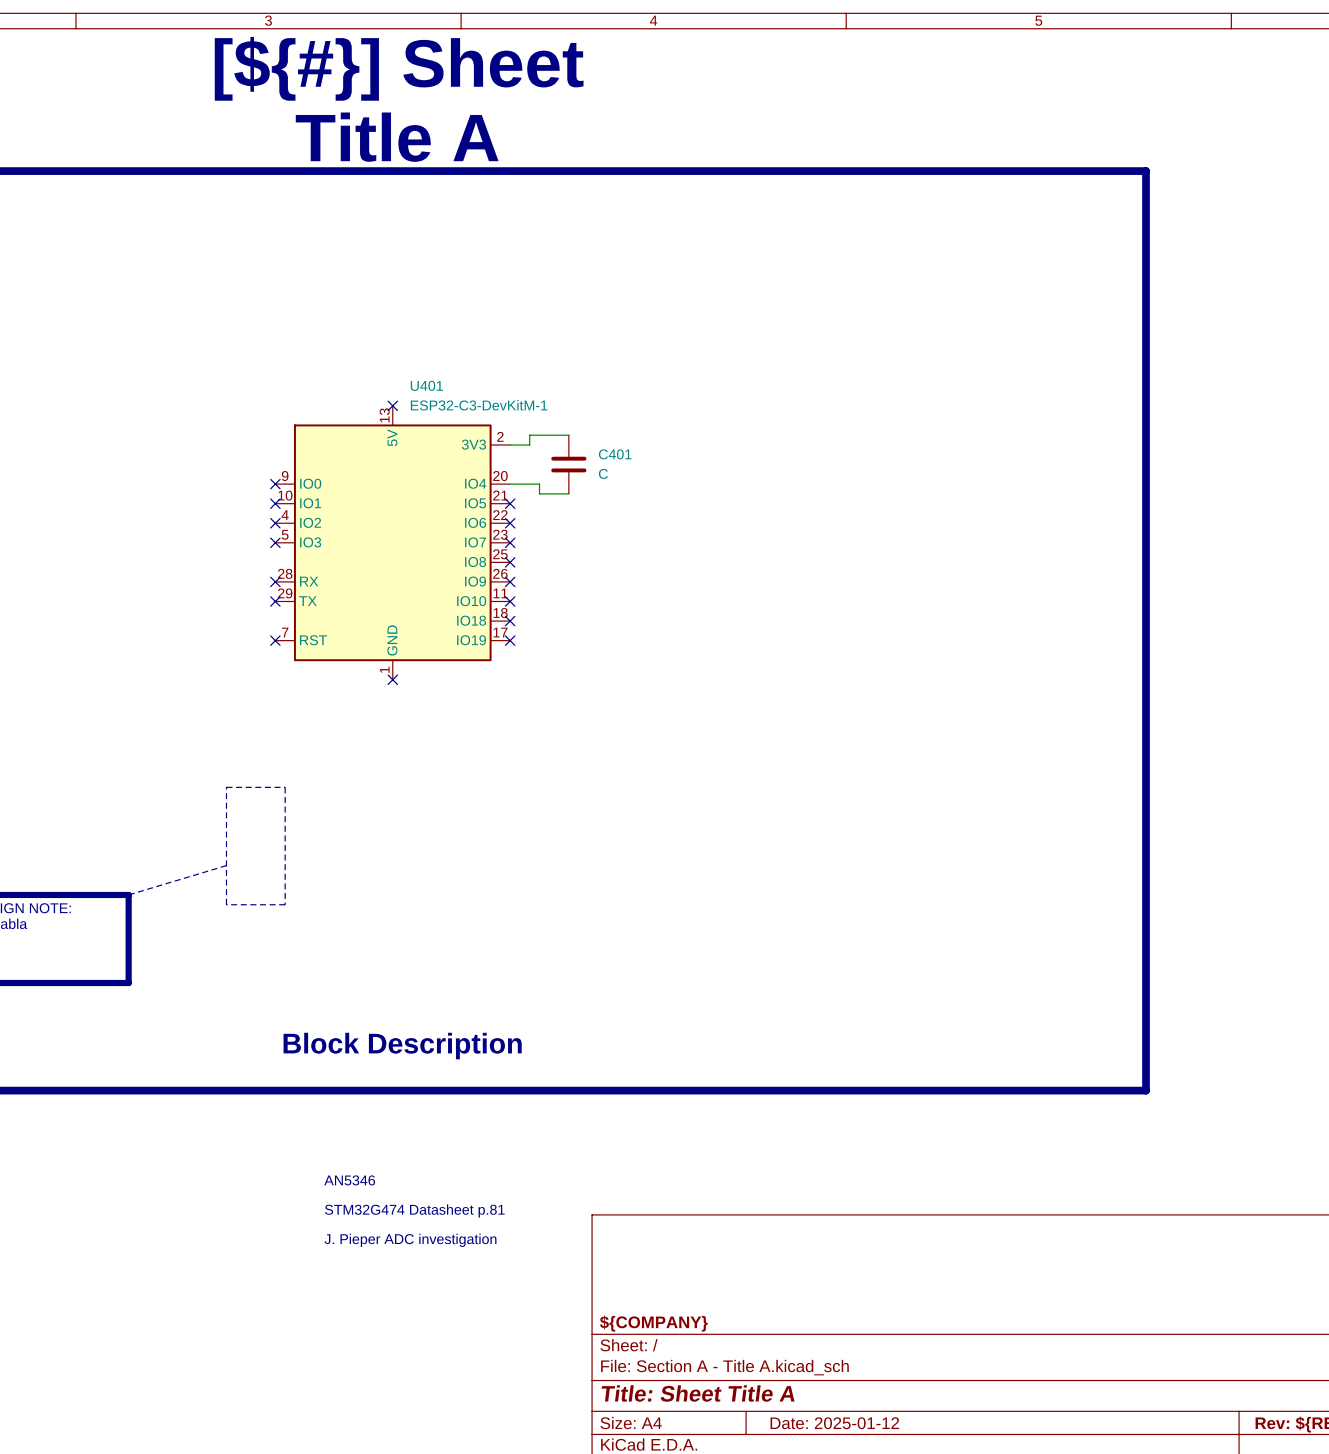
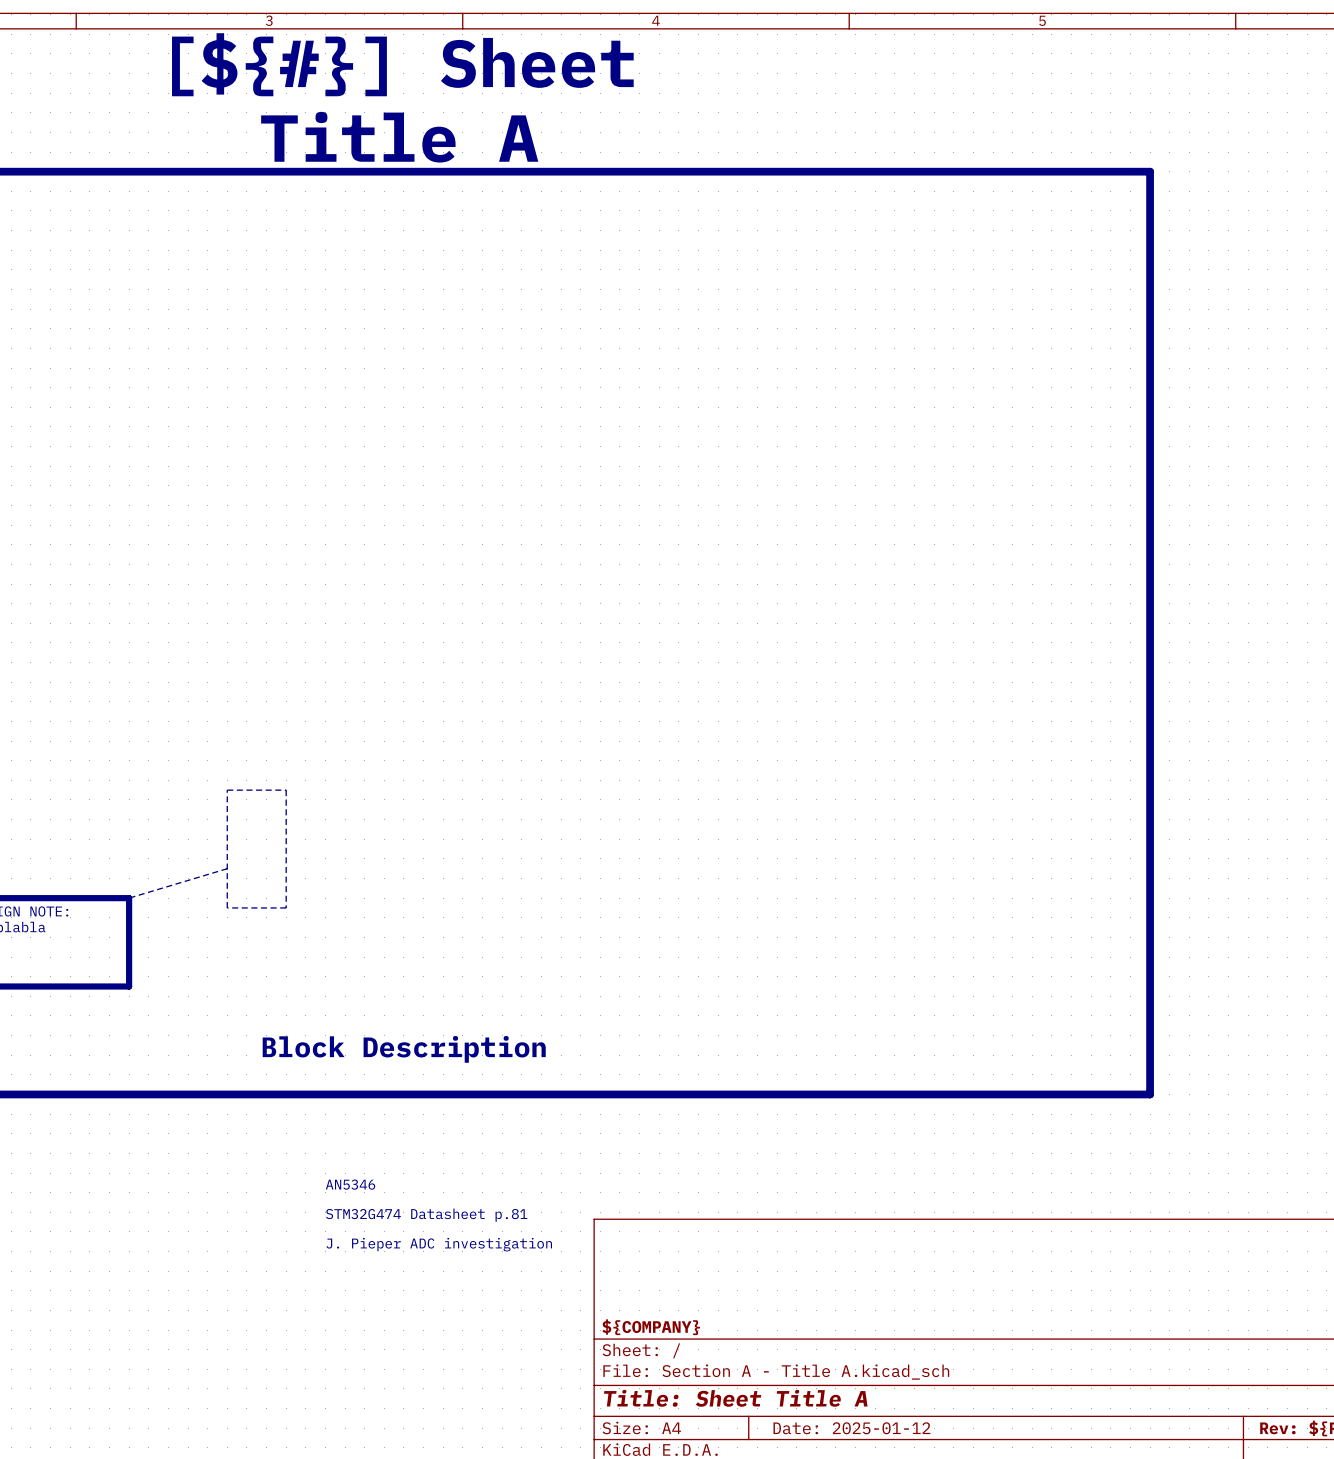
no-connect mark: (392, 405) -> none
wire: (568, 435) (529, 435) (529, 444) (510, 444) -> none
C401: C (568, 464) -> none
no-connect mark: (275, 484) -> none
wire: (510, 484) (539, 484) (539, 493) (568, 493) -> none
no-connect mark: (275, 503) -> none
no-connect mark: (510, 503) -> none
no-connect mark: (275, 523) -> none
no-connect mark: (510, 523) -> none
no-connect mark: (275, 542) -> none
U401: ESP32-C3-DevKitM-1 (392, 542) -> none
no-connect mark: (510, 542) -> none
no-connect mark: (510, 562) -> none
no-connect mark: (275, 581) -> none
no-connect mark: (510, 581) -> none
no-connect mark: (275, 601) -> none
no-connect mark: (510, 601) -> none
no-connect mark: (510, 621) -> none
no-connect mark: (275, 640) -> none
no-connect mark: (510, 640) -> none
no-connect mark: (392, 679) -> none

